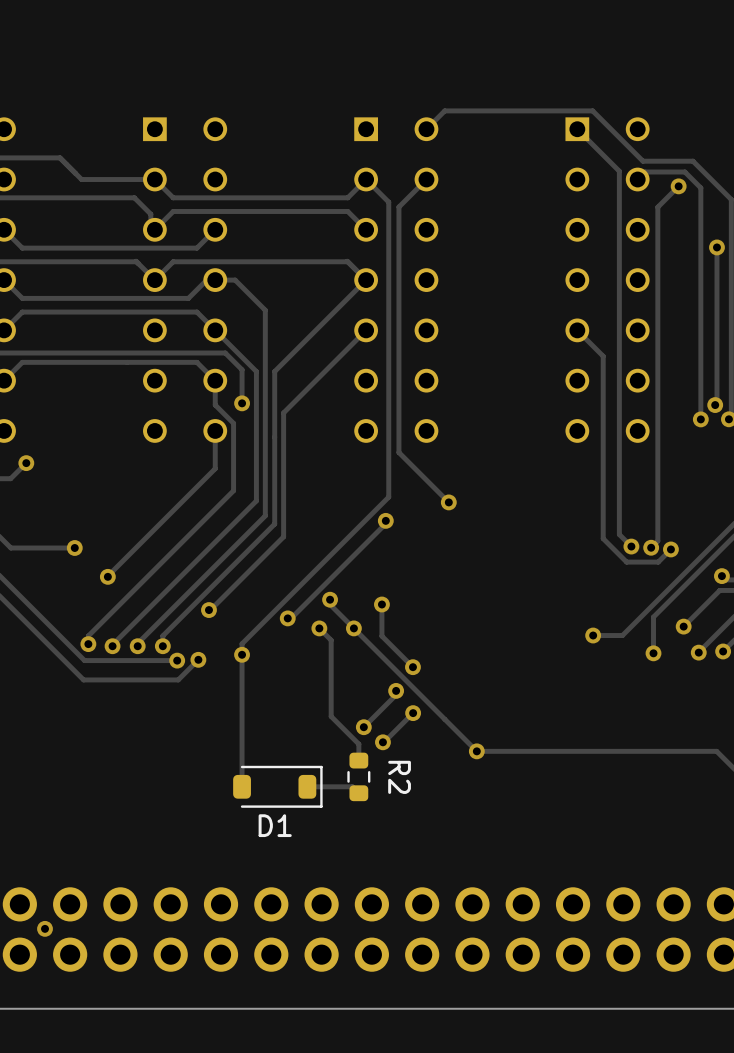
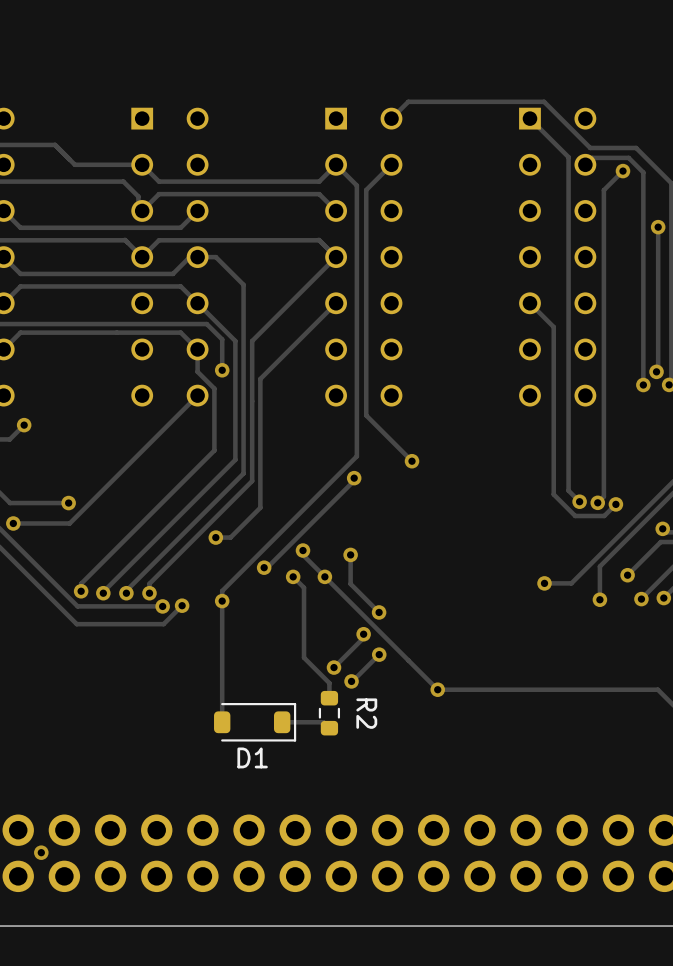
track: (215, 430) (215, 468) (107, 576) -> (197, 395) (69, 523) (13, 523)
track: (283, 536) (208, 610) -> (260, 492) (260, 507) (230, 537) (215, 537)
via: none -> (13, 523)
via: (107, 576) -> none
via position: (208, 610) -> (215, 537)

